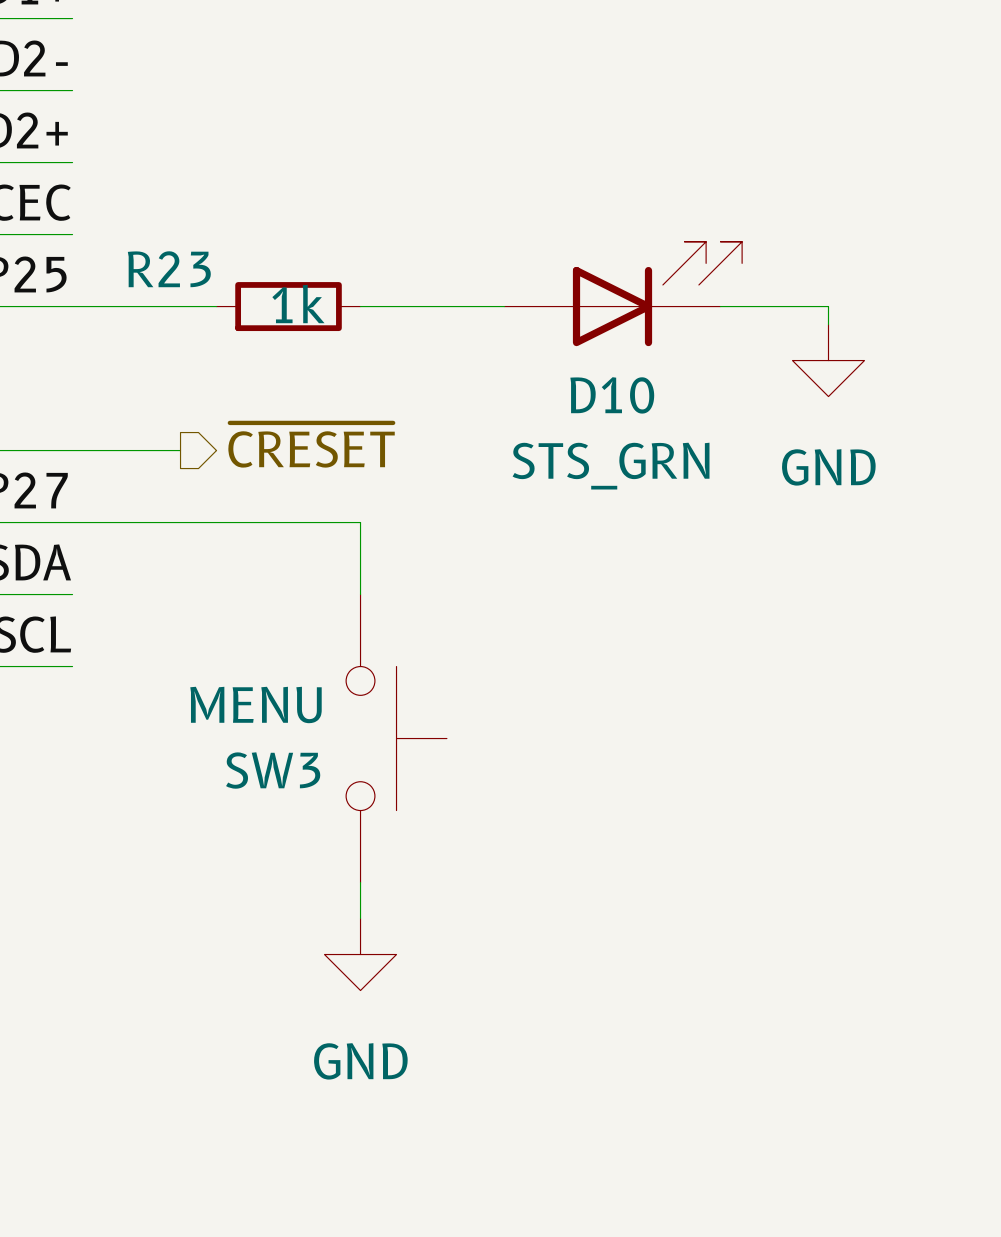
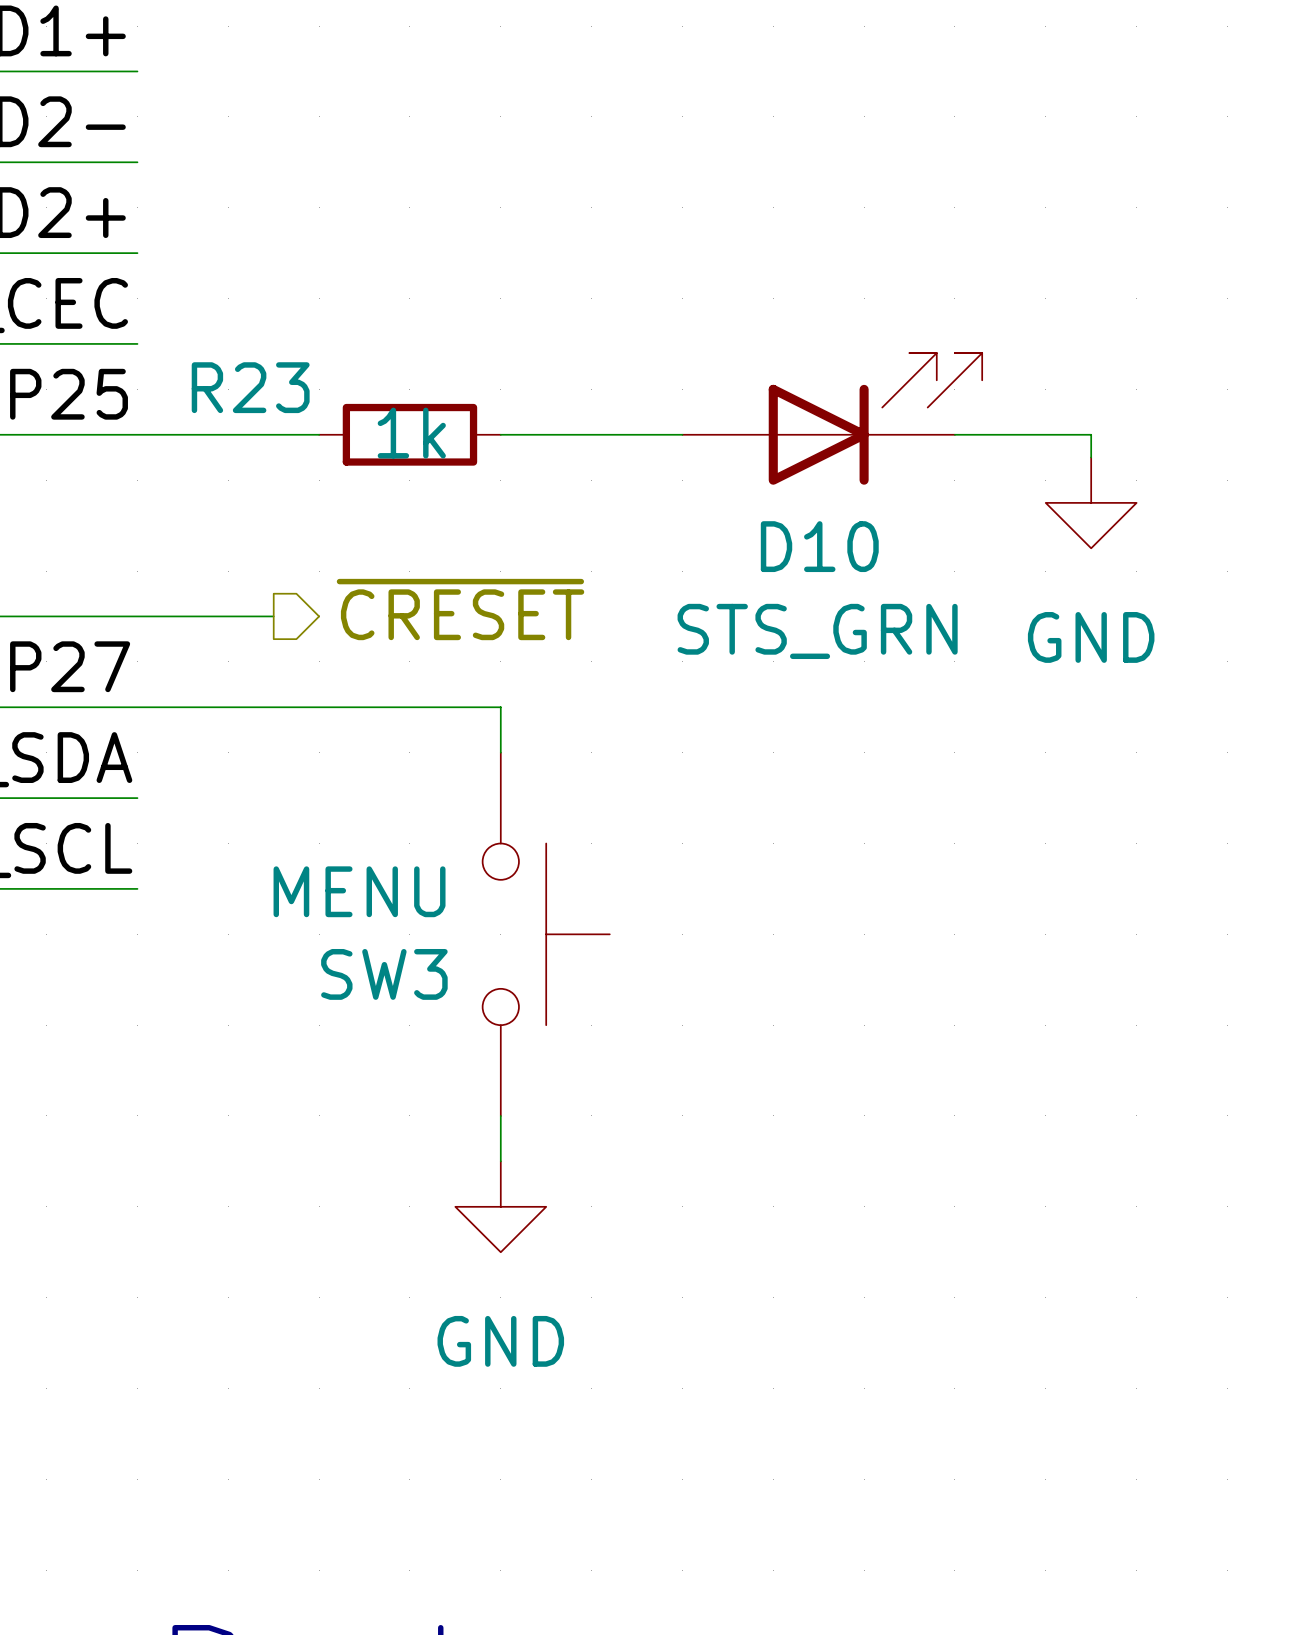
SW3 position: (396, 738) -> (546, 934)
power symbol position: GND (360, 954) -> GND (500, 1206)

